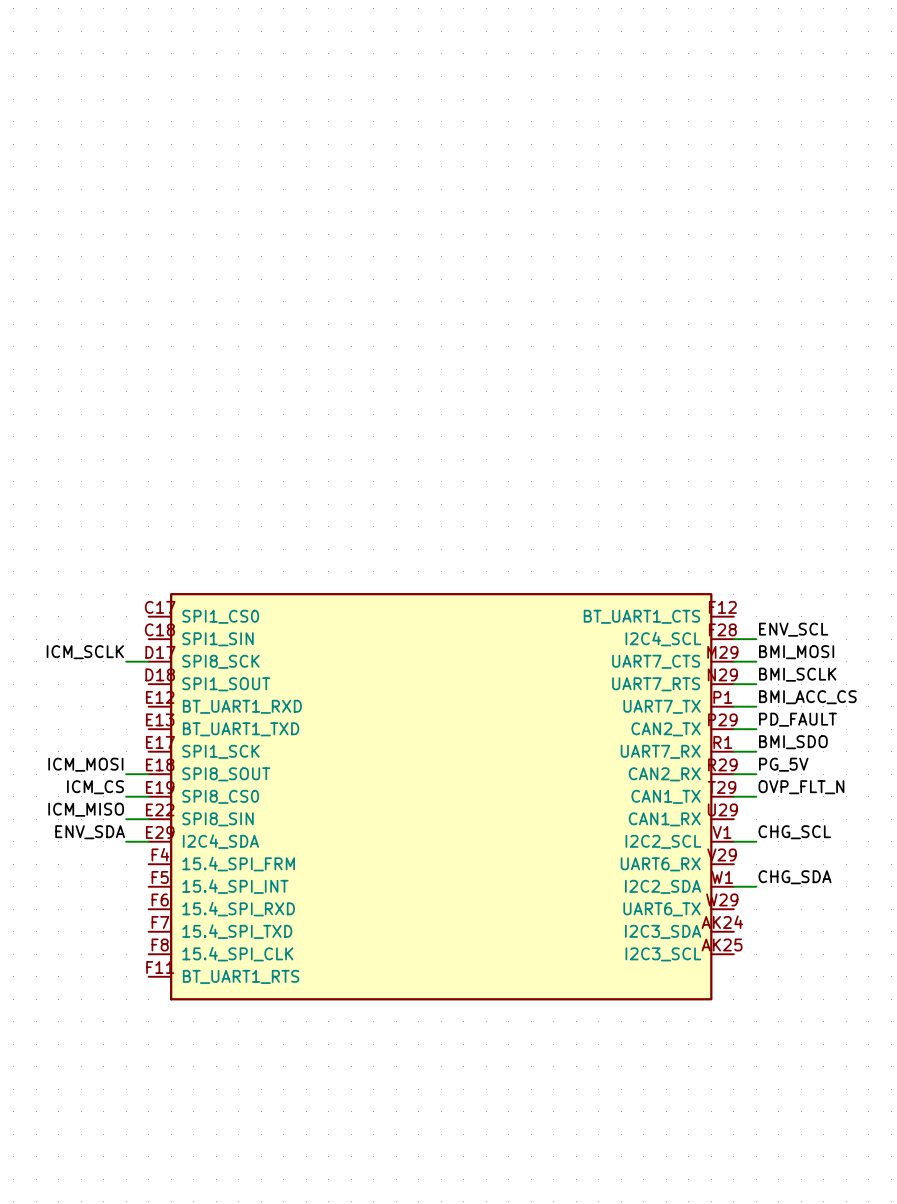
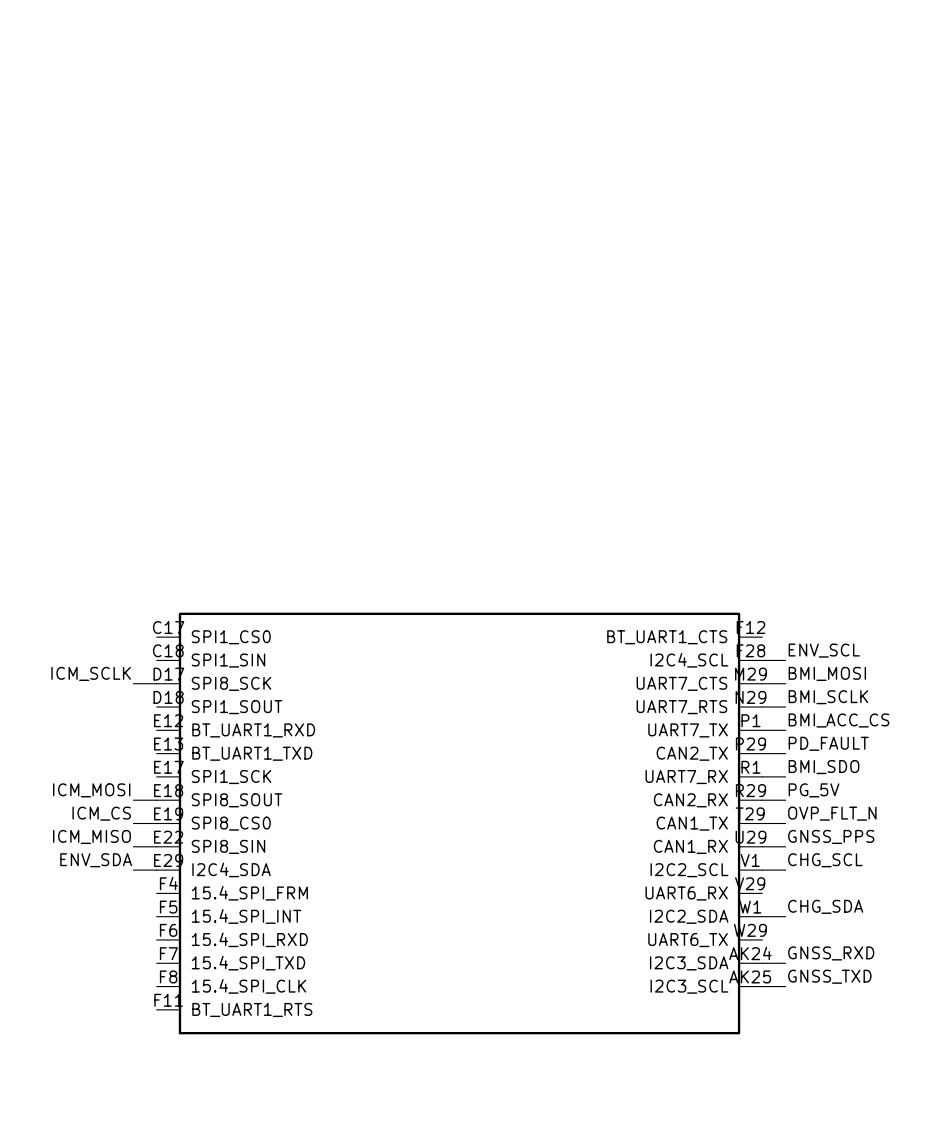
label: none -> GNSS_PPS (831, 836)
wire: none -> (762, 846) (785, 846)
label: none -> GNSS_RXD (831, 953)
wire: none -> (762, 963) (785, 963)
label: none -> GNSS_TXD (829, 976)
wire: none -> (762, 986) (785, 986)

